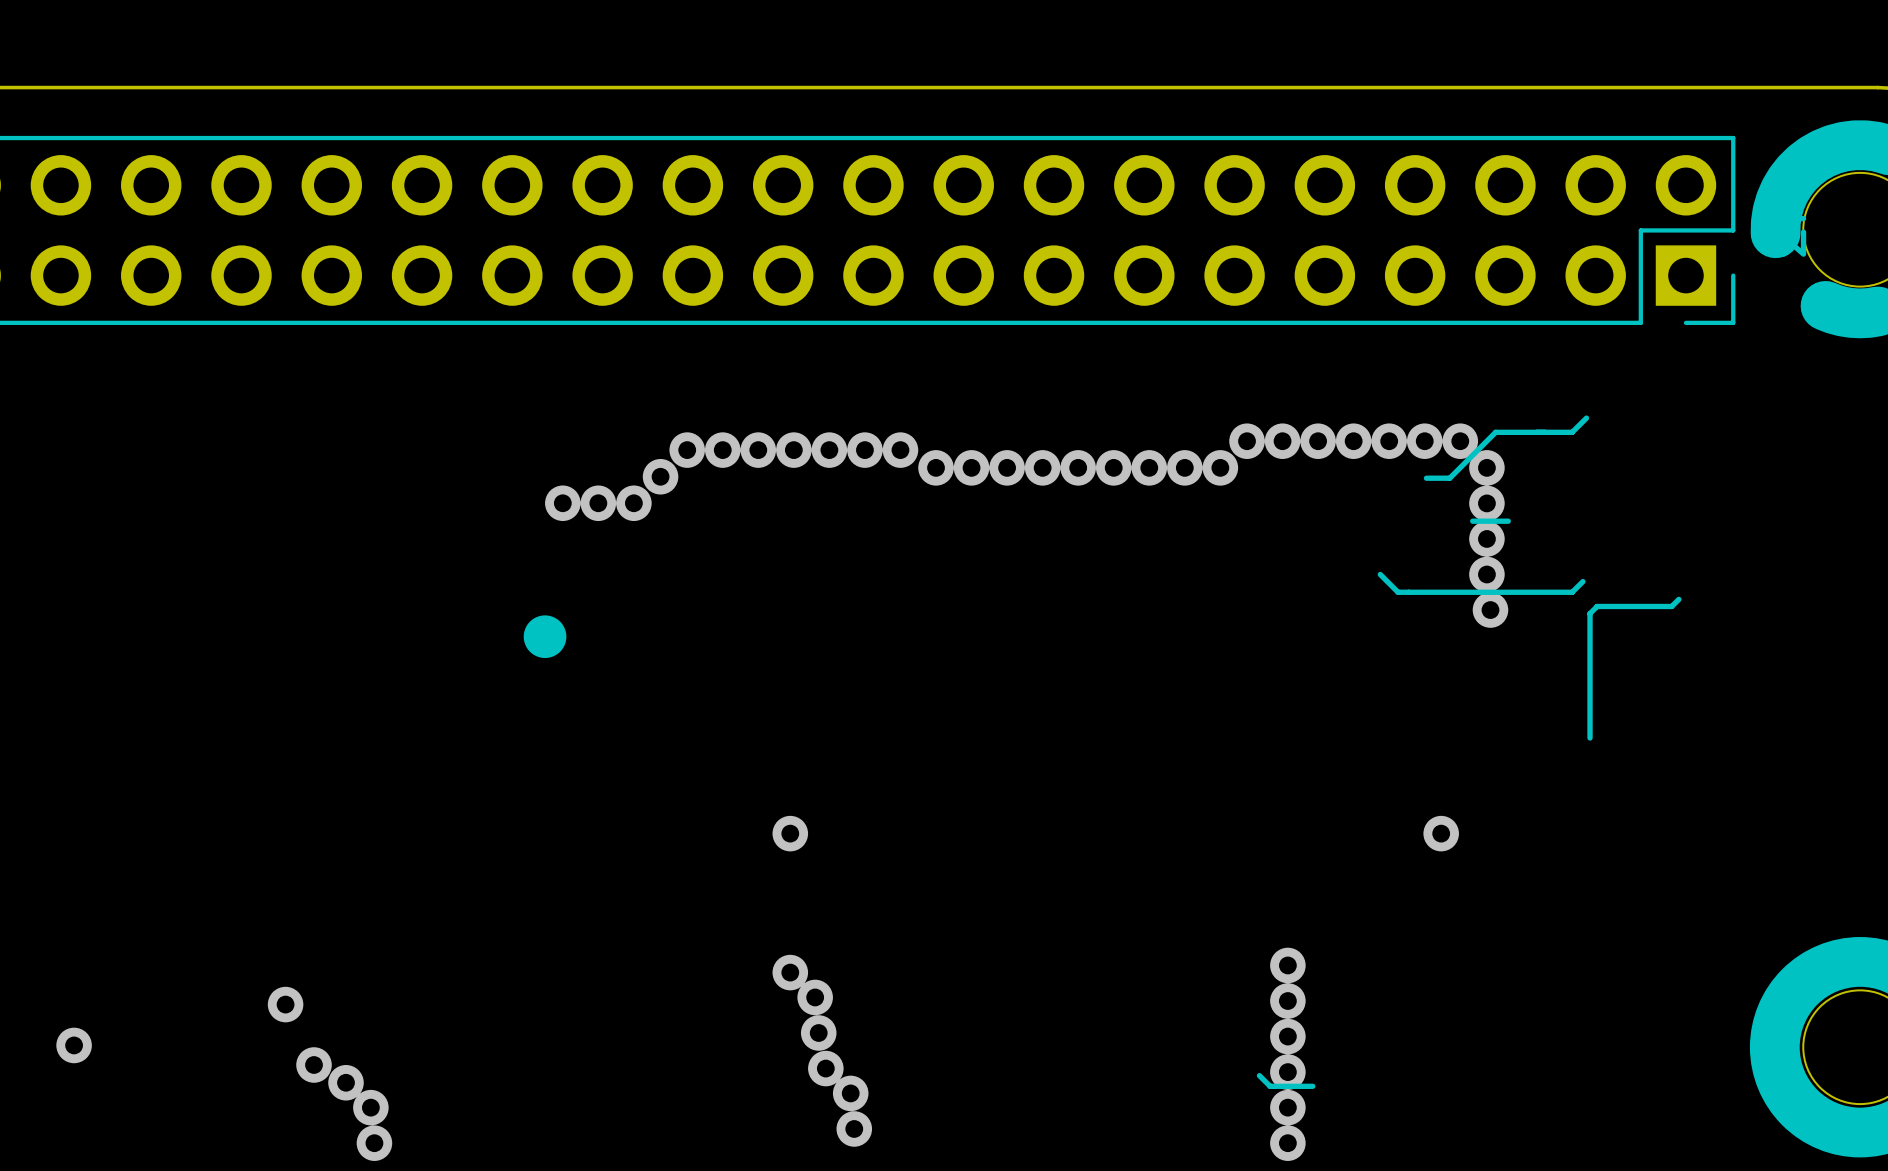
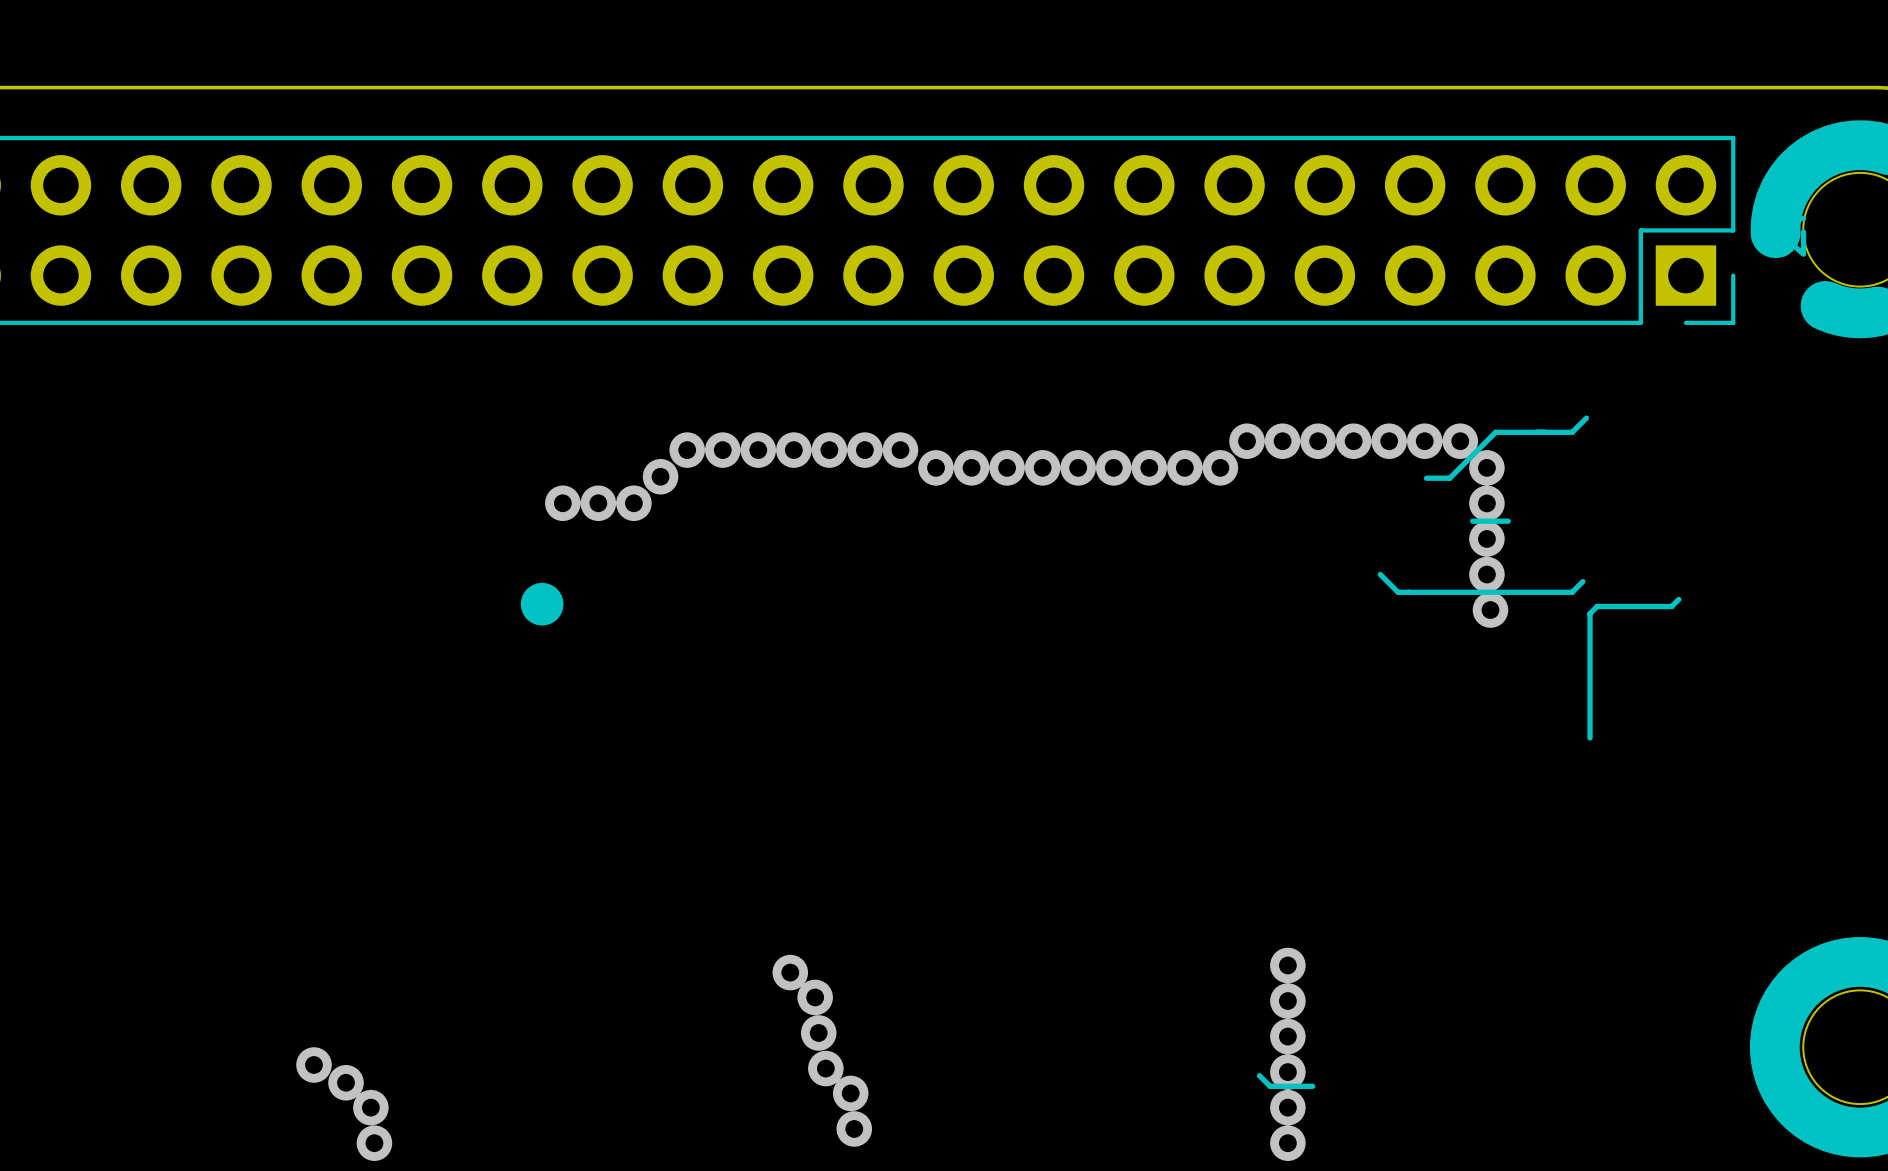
drawing position: (545, 636) -> (542, 604)
via: (790, 833) -> none
via: (1441, 833) -> none
via: (285, 1004) -> none
via: (74, 1045) -> none

